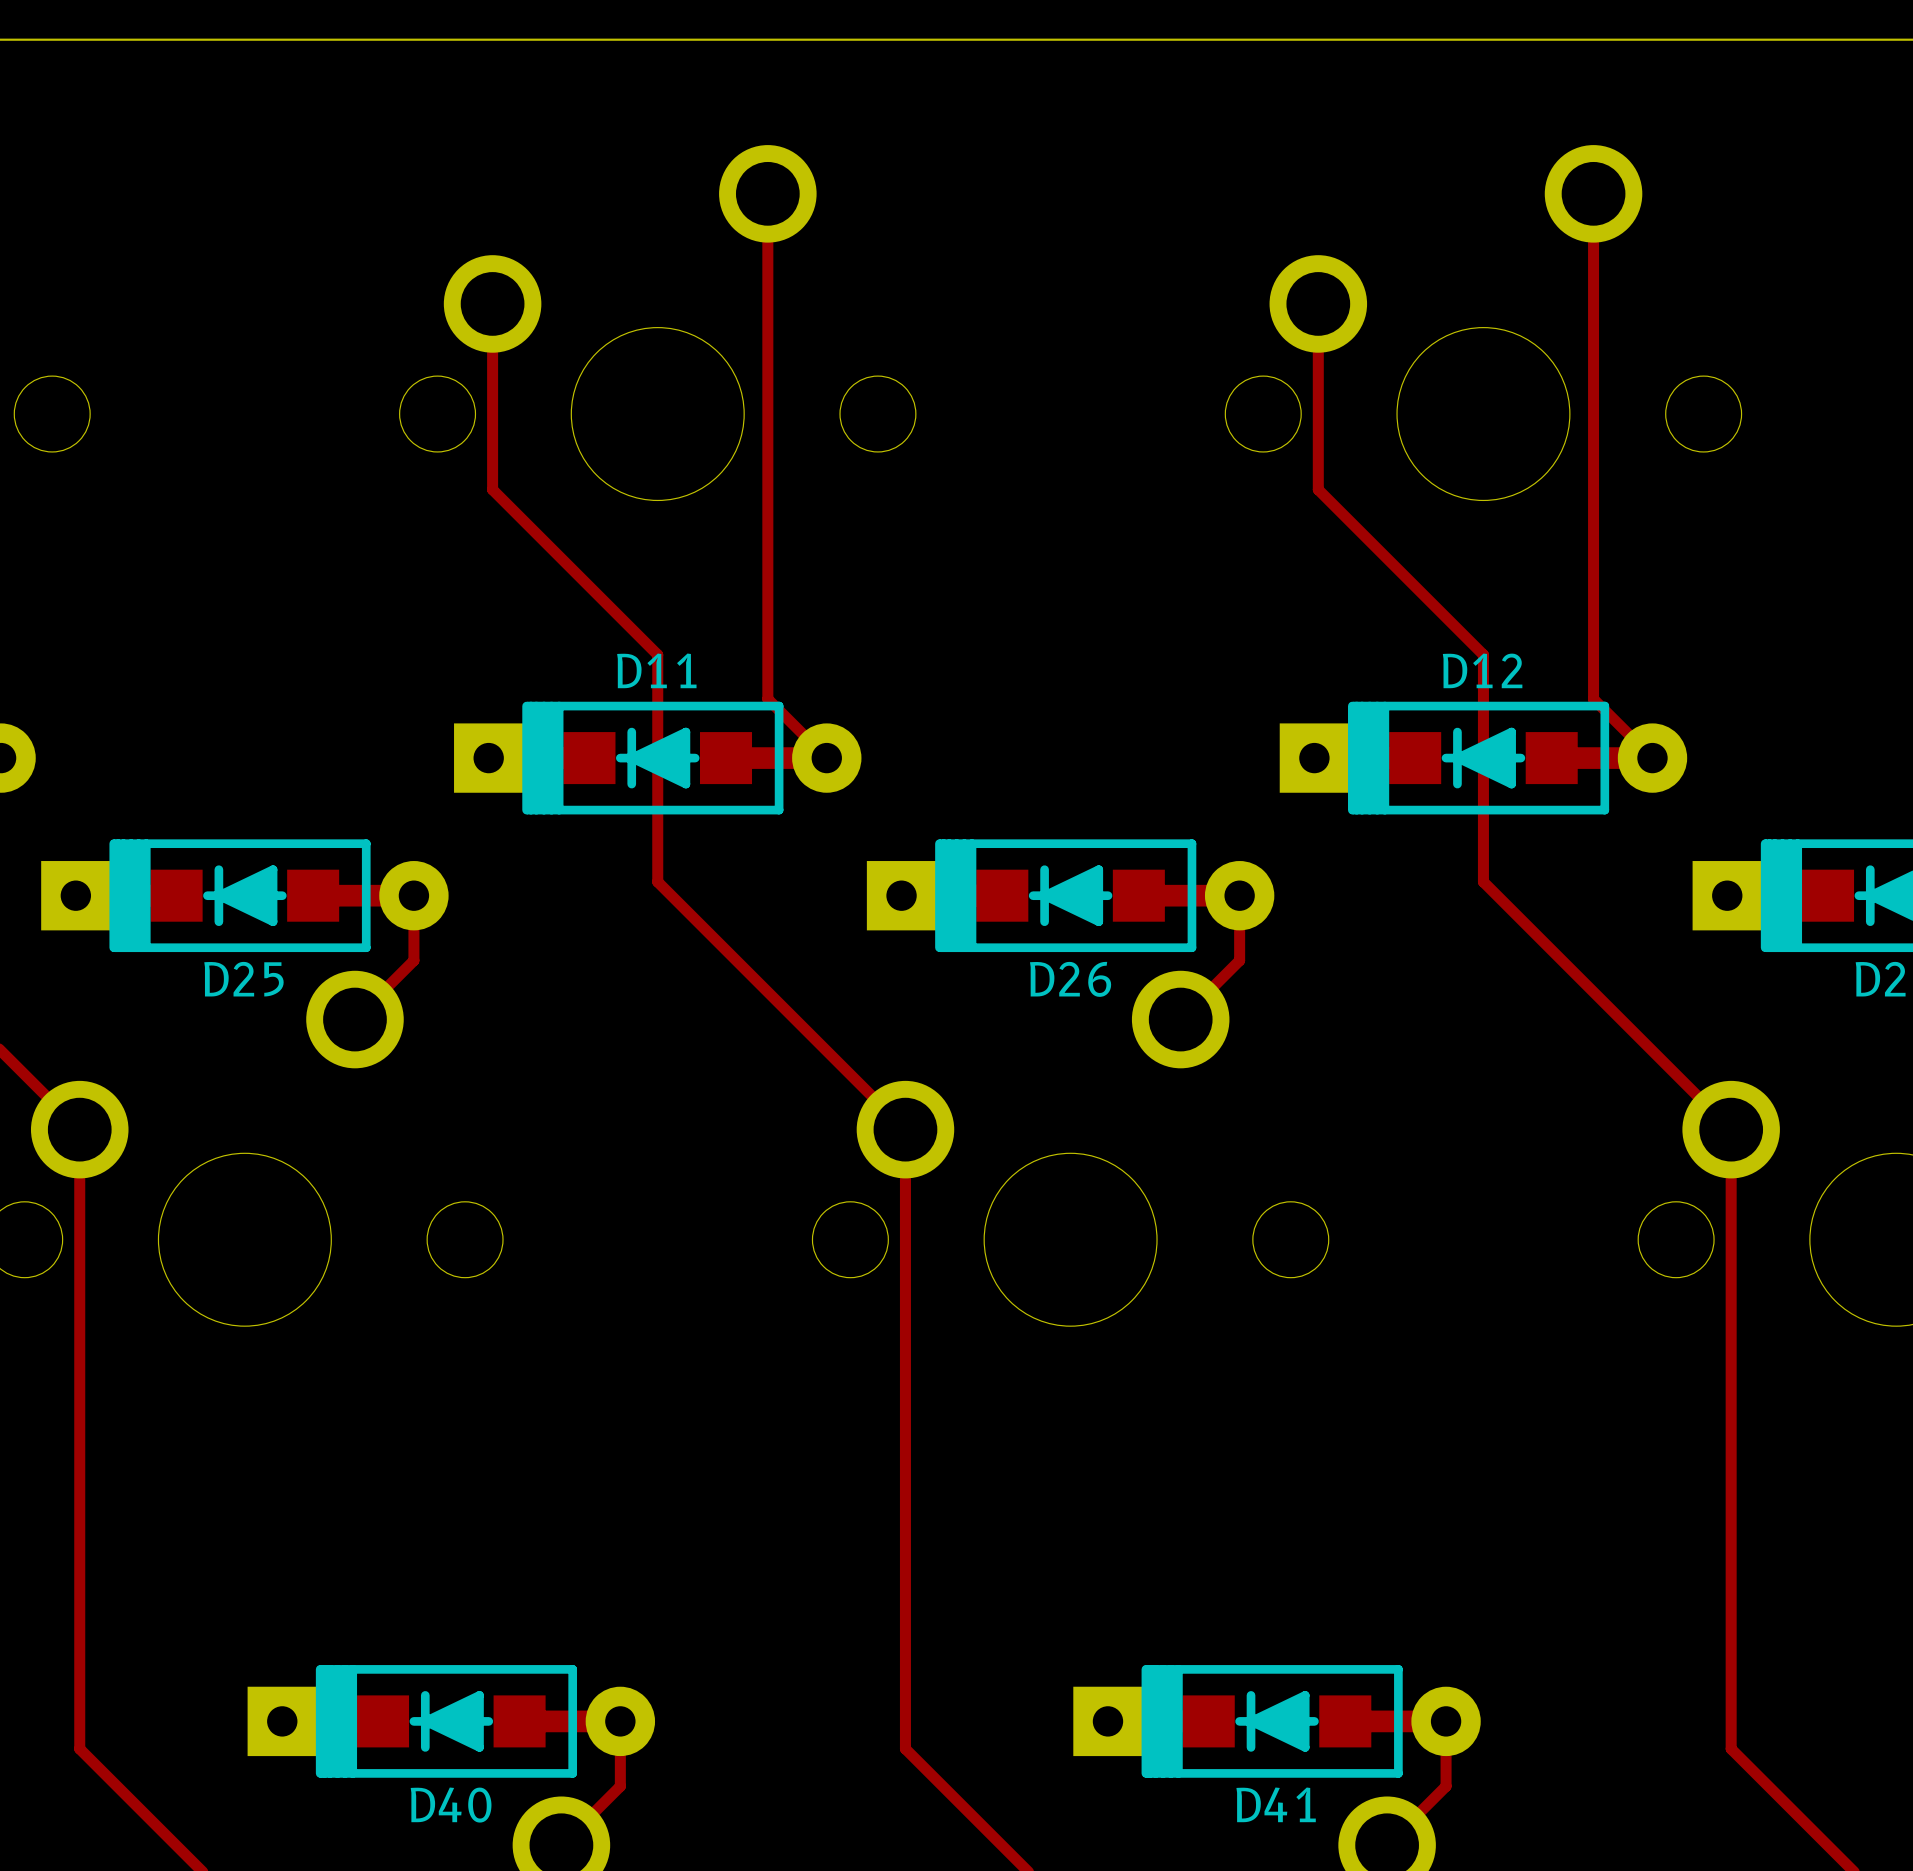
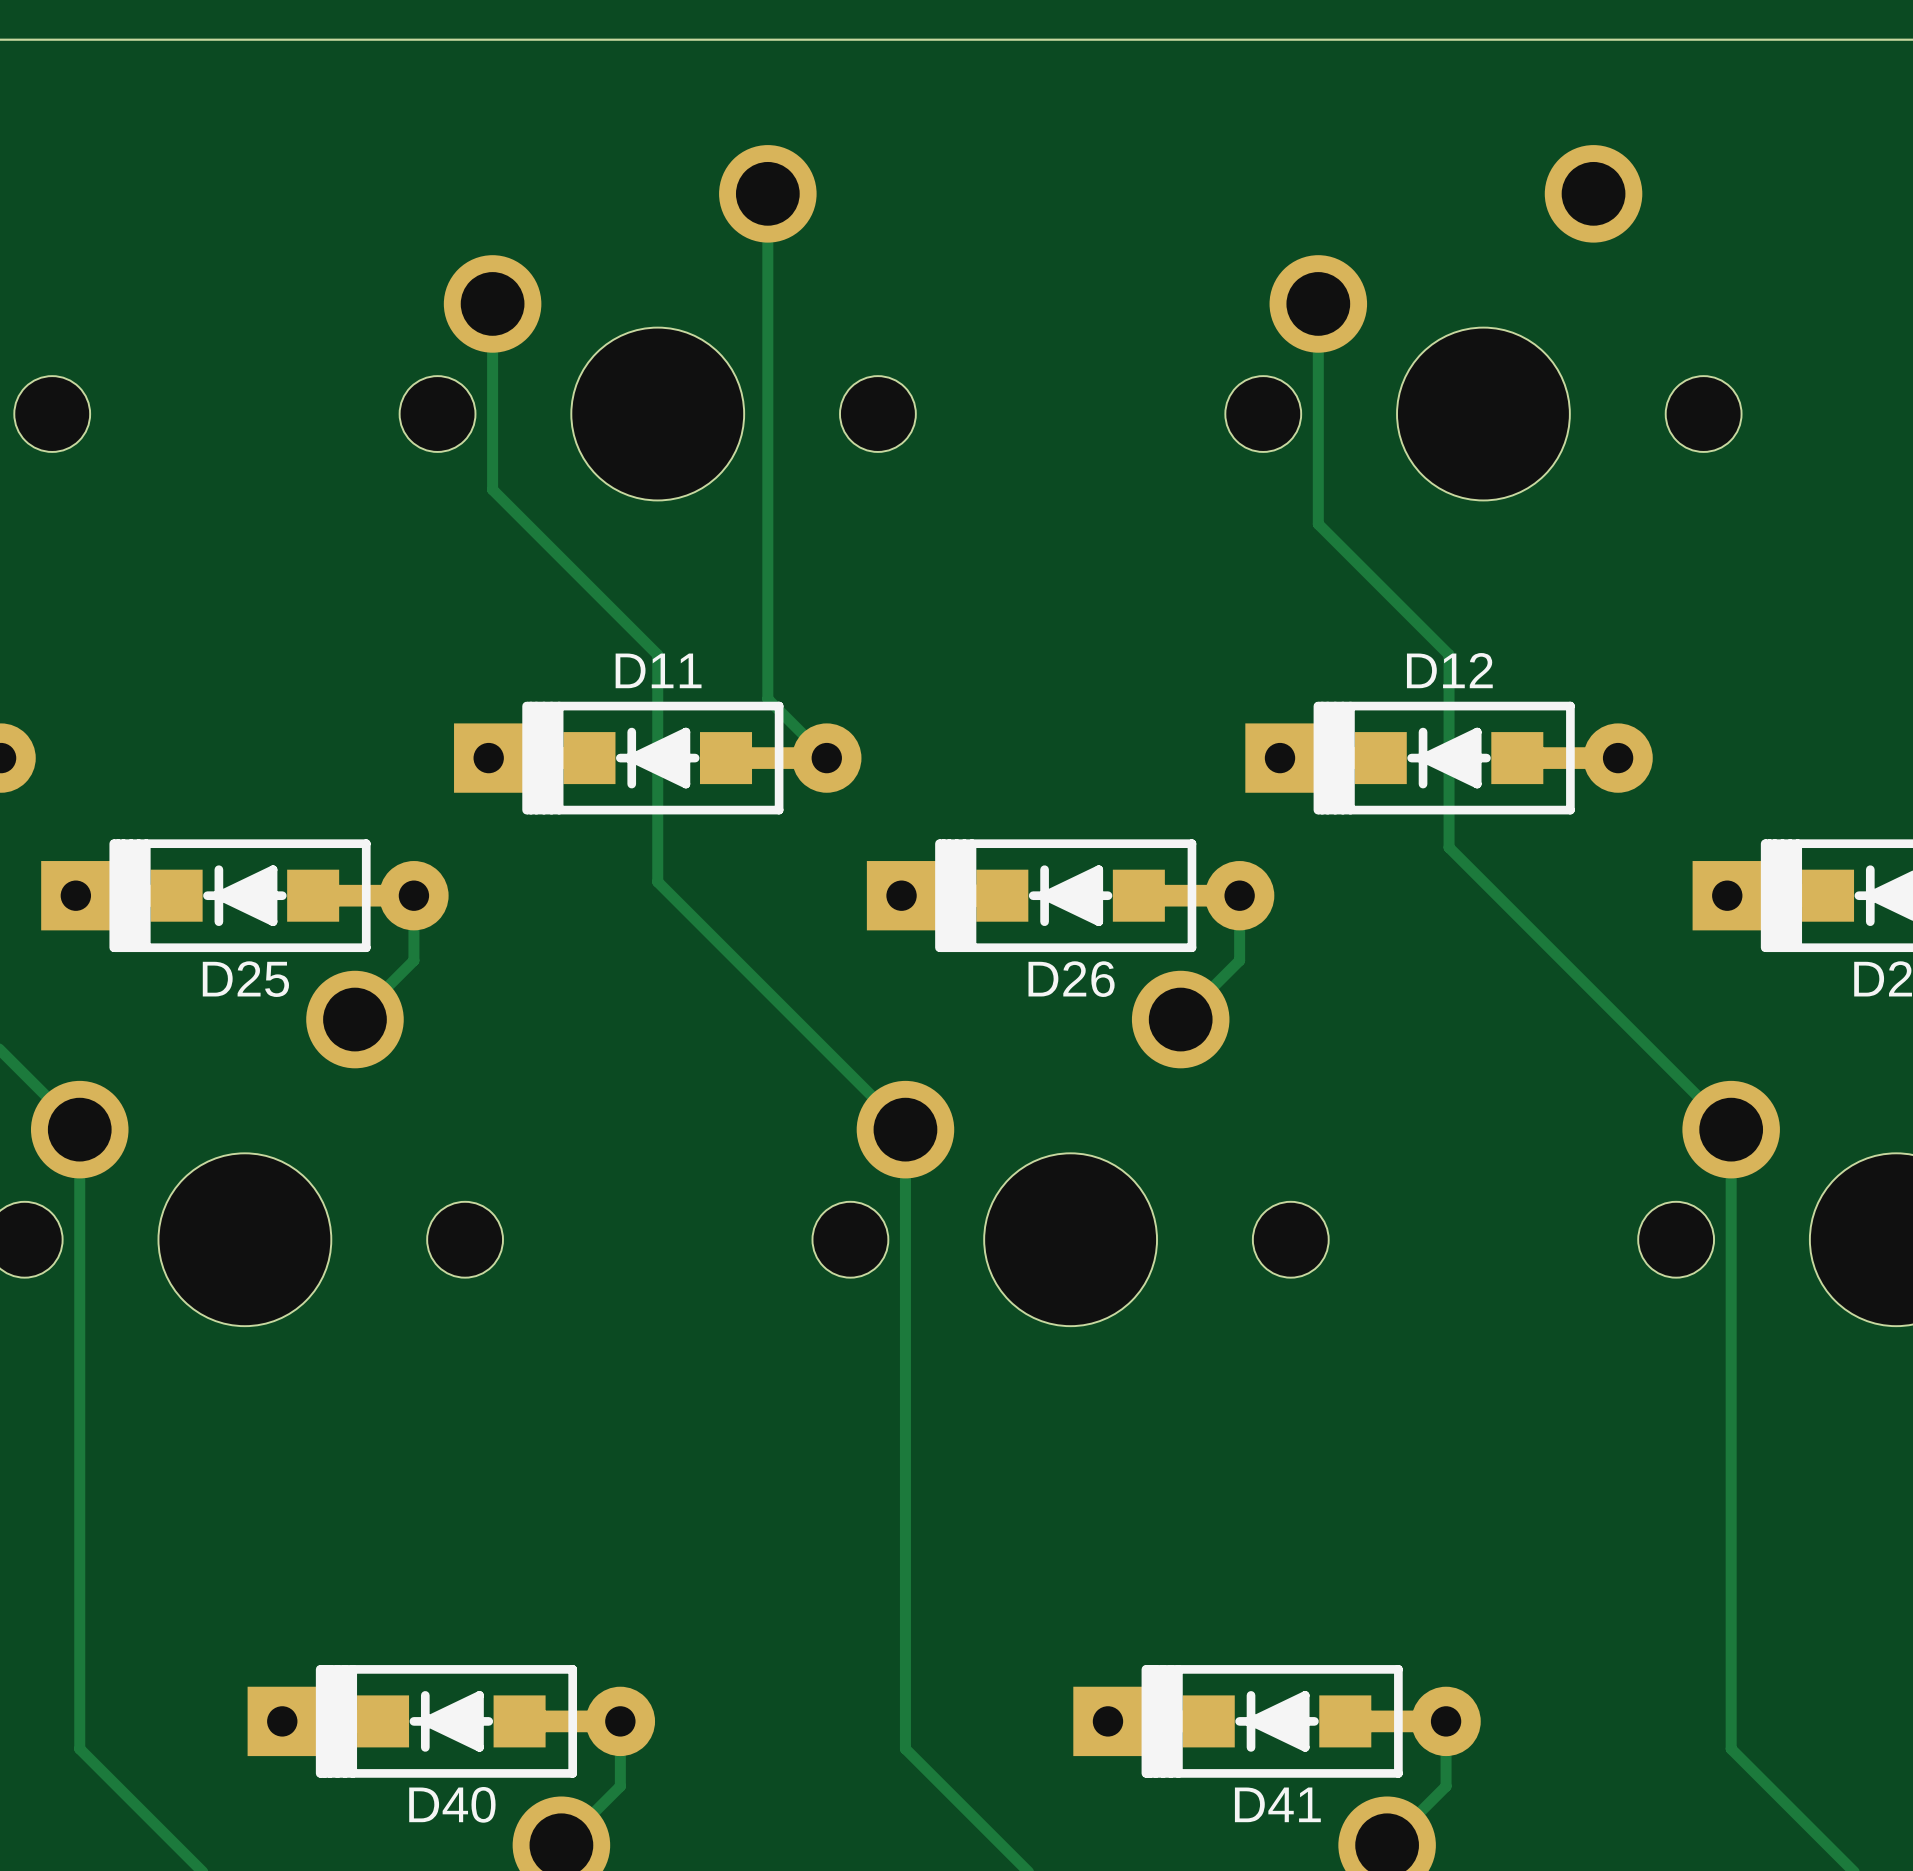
track: (1593, 193) (1593, 699) (1652, 758) -> none
track: (1318, 489) (1483, 654) (1483, 881) -> (1318, 489) (1318, 524) (1449, 654) (1449, 847) (1483, 881)
D12 position: (1483, 758) -> (1449, 758)

